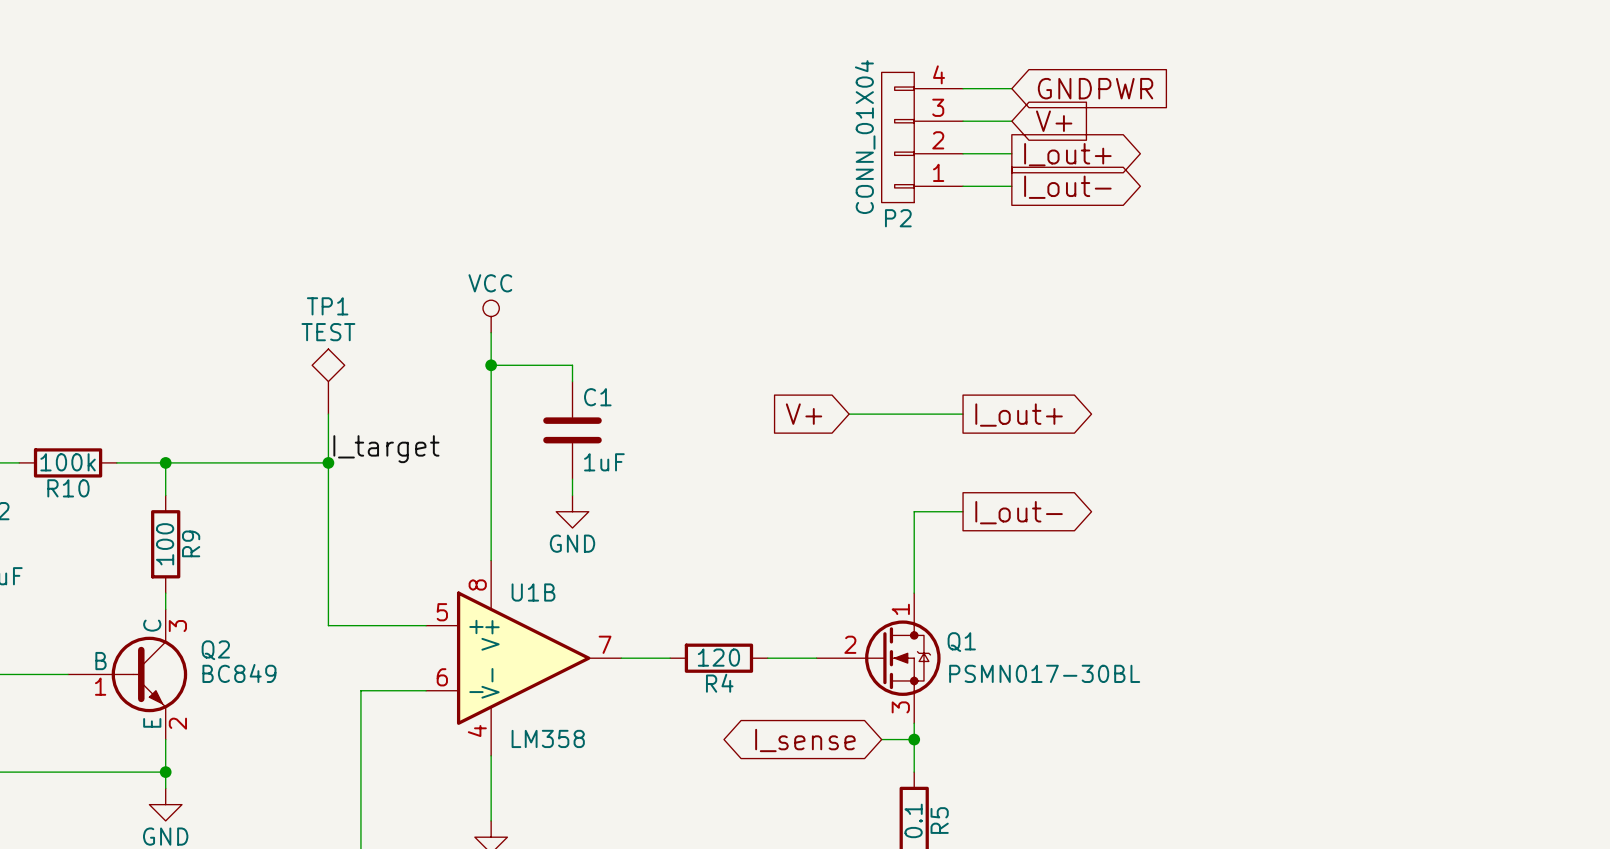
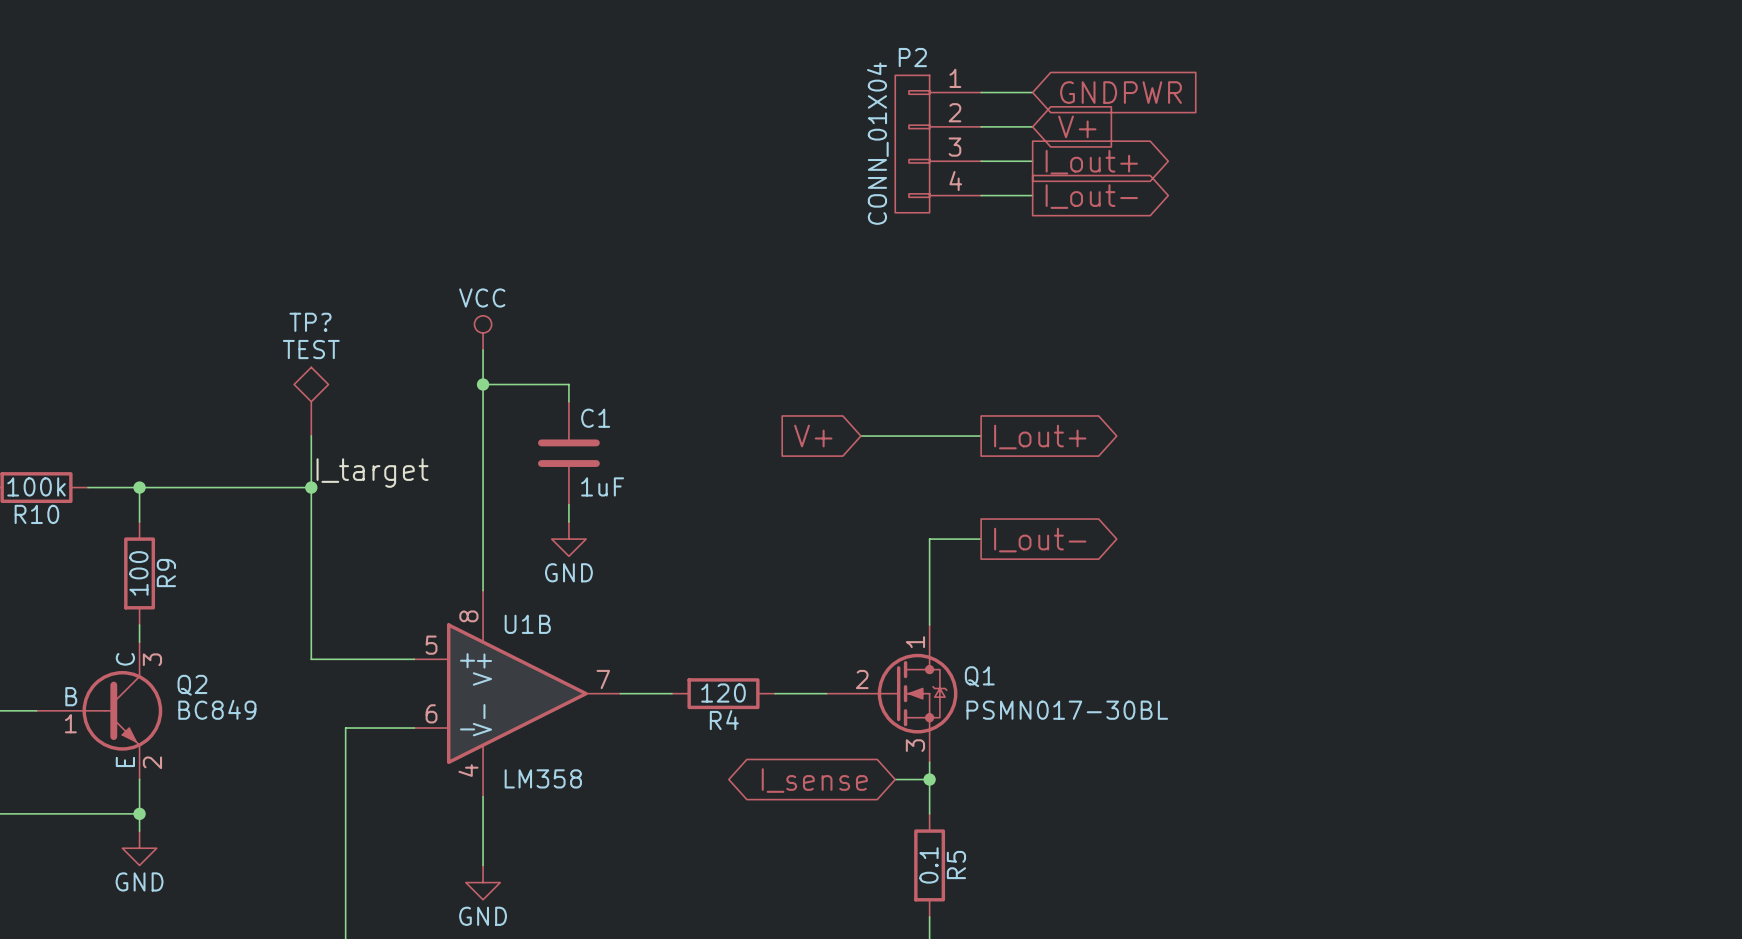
P2 flip: as is (897, 137) -> up-down (912, 144)
TP1 name: TP1 (327, 306) -> TP? (310, 322)

